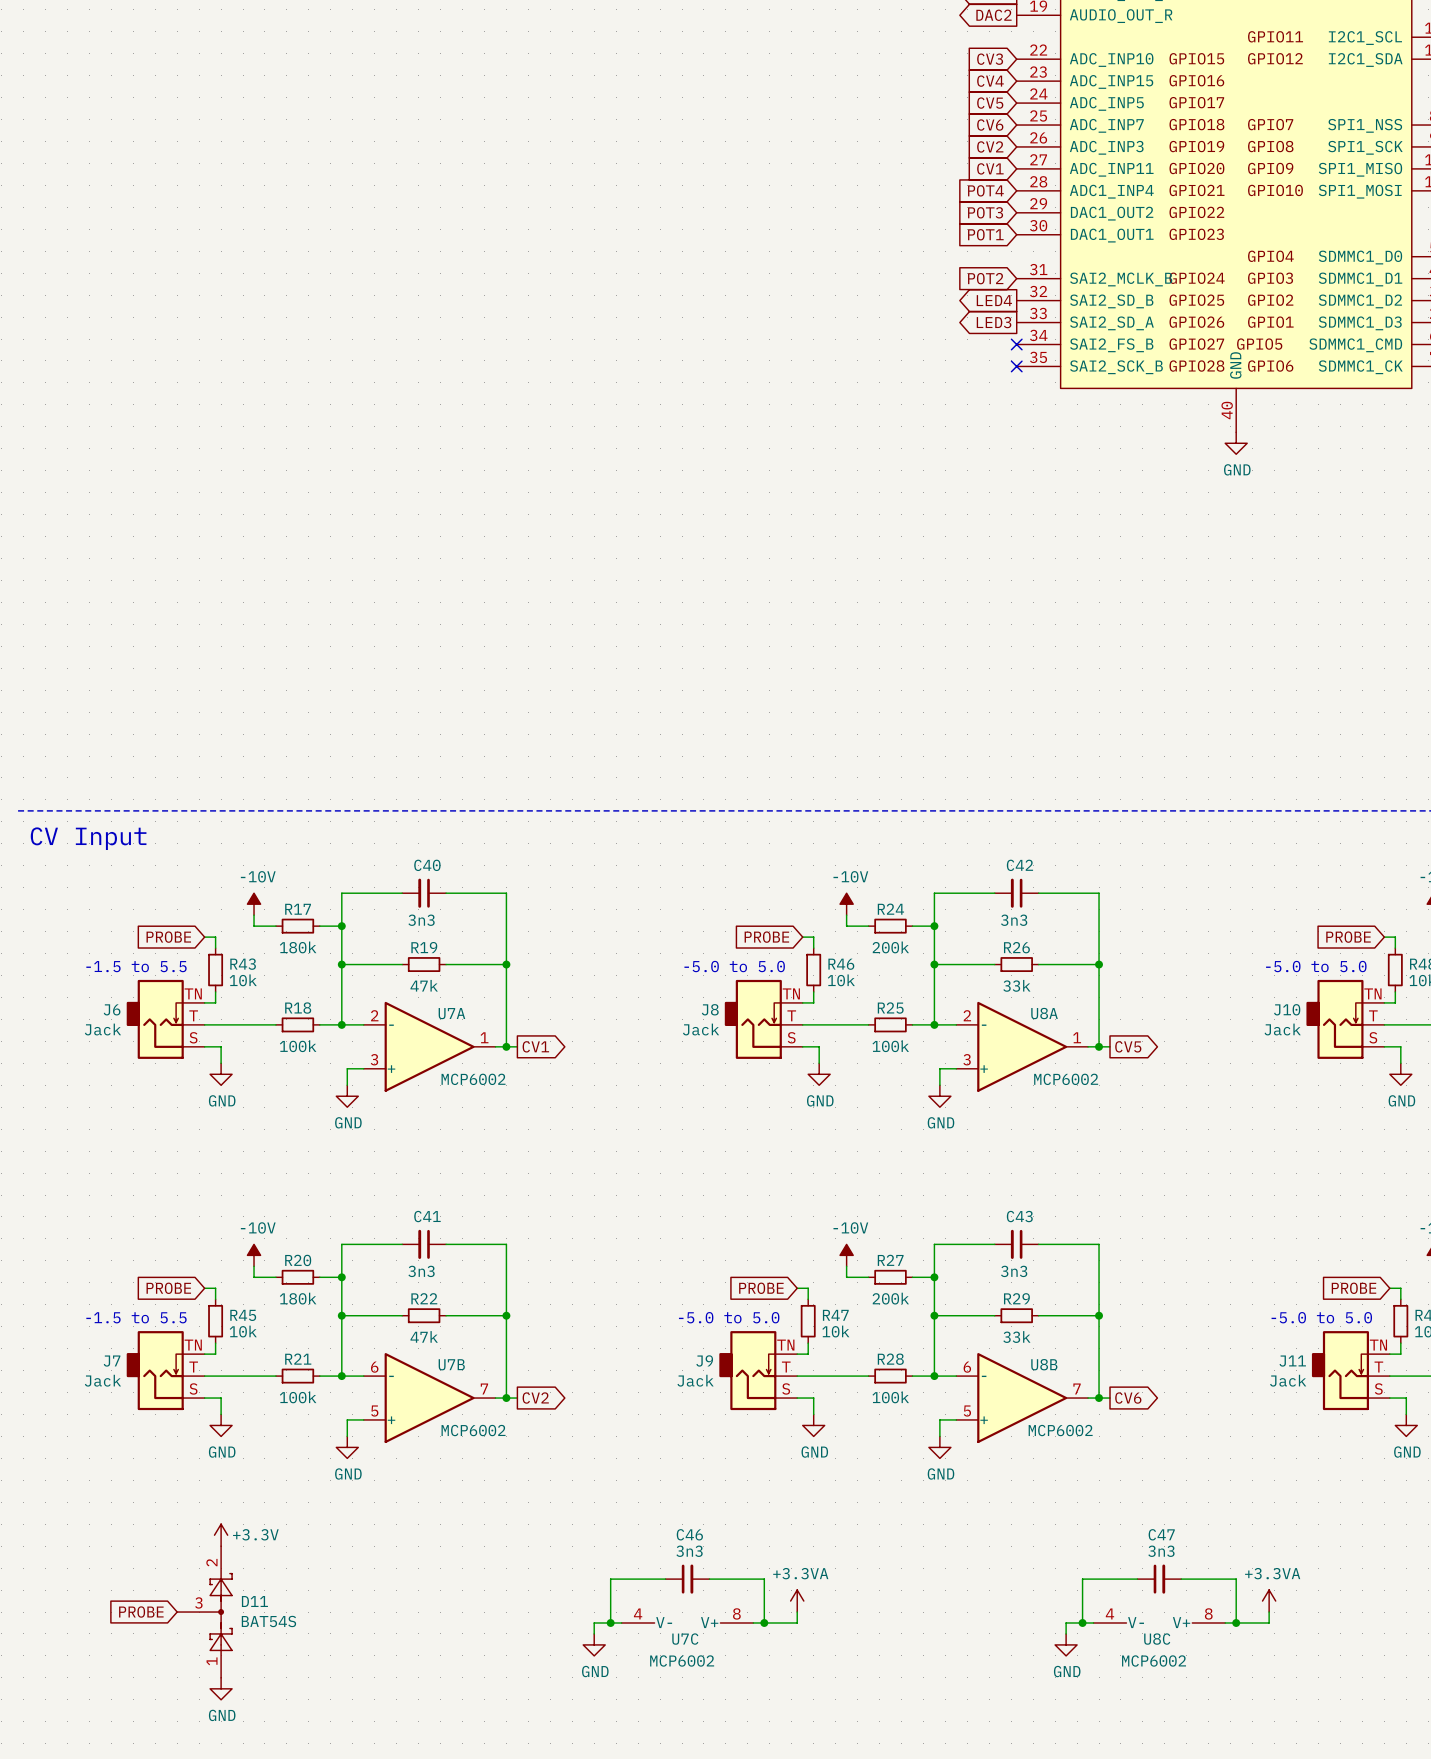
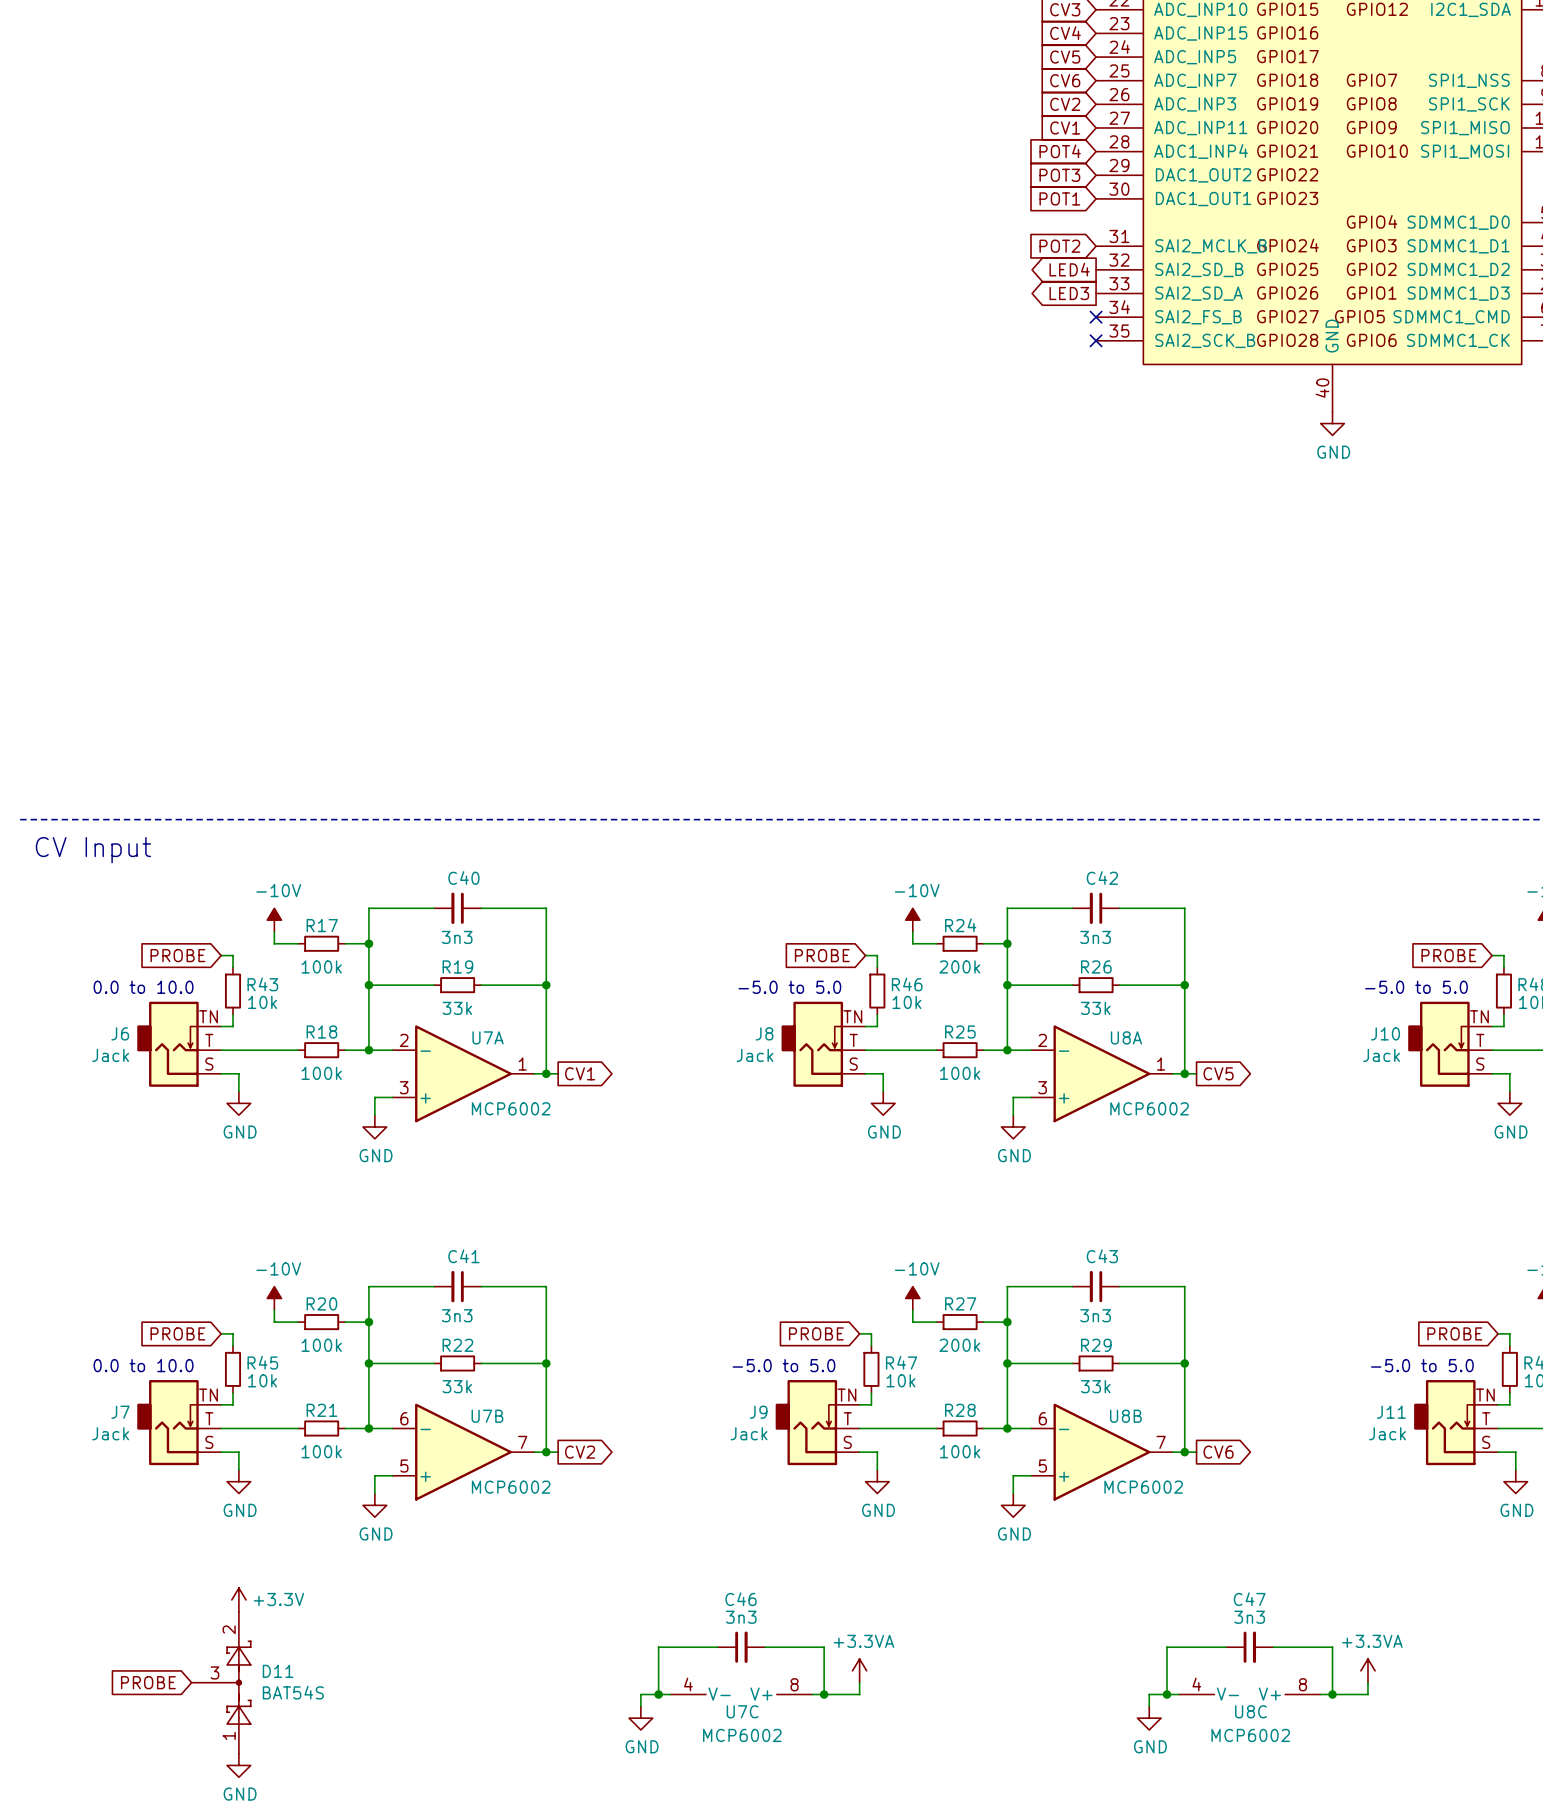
R17 value: 180k (298, 947) -> 100k (321, 966)
text: -1.5 to 5.5 (136, 966) -> 0.0 to 10.0 (143, 987)
R19 value: 47k (424, 985) -> 33k (457, 1008)
R20 value: 180k (298, 1298) -> 100k (321, 1345)
text: -1.5 to 5.5 (136, 1317) -> 0.0 to 10.0 (143, 1365)
R22 value: 47k (424, 1336) -> 33k (457, 1386)

